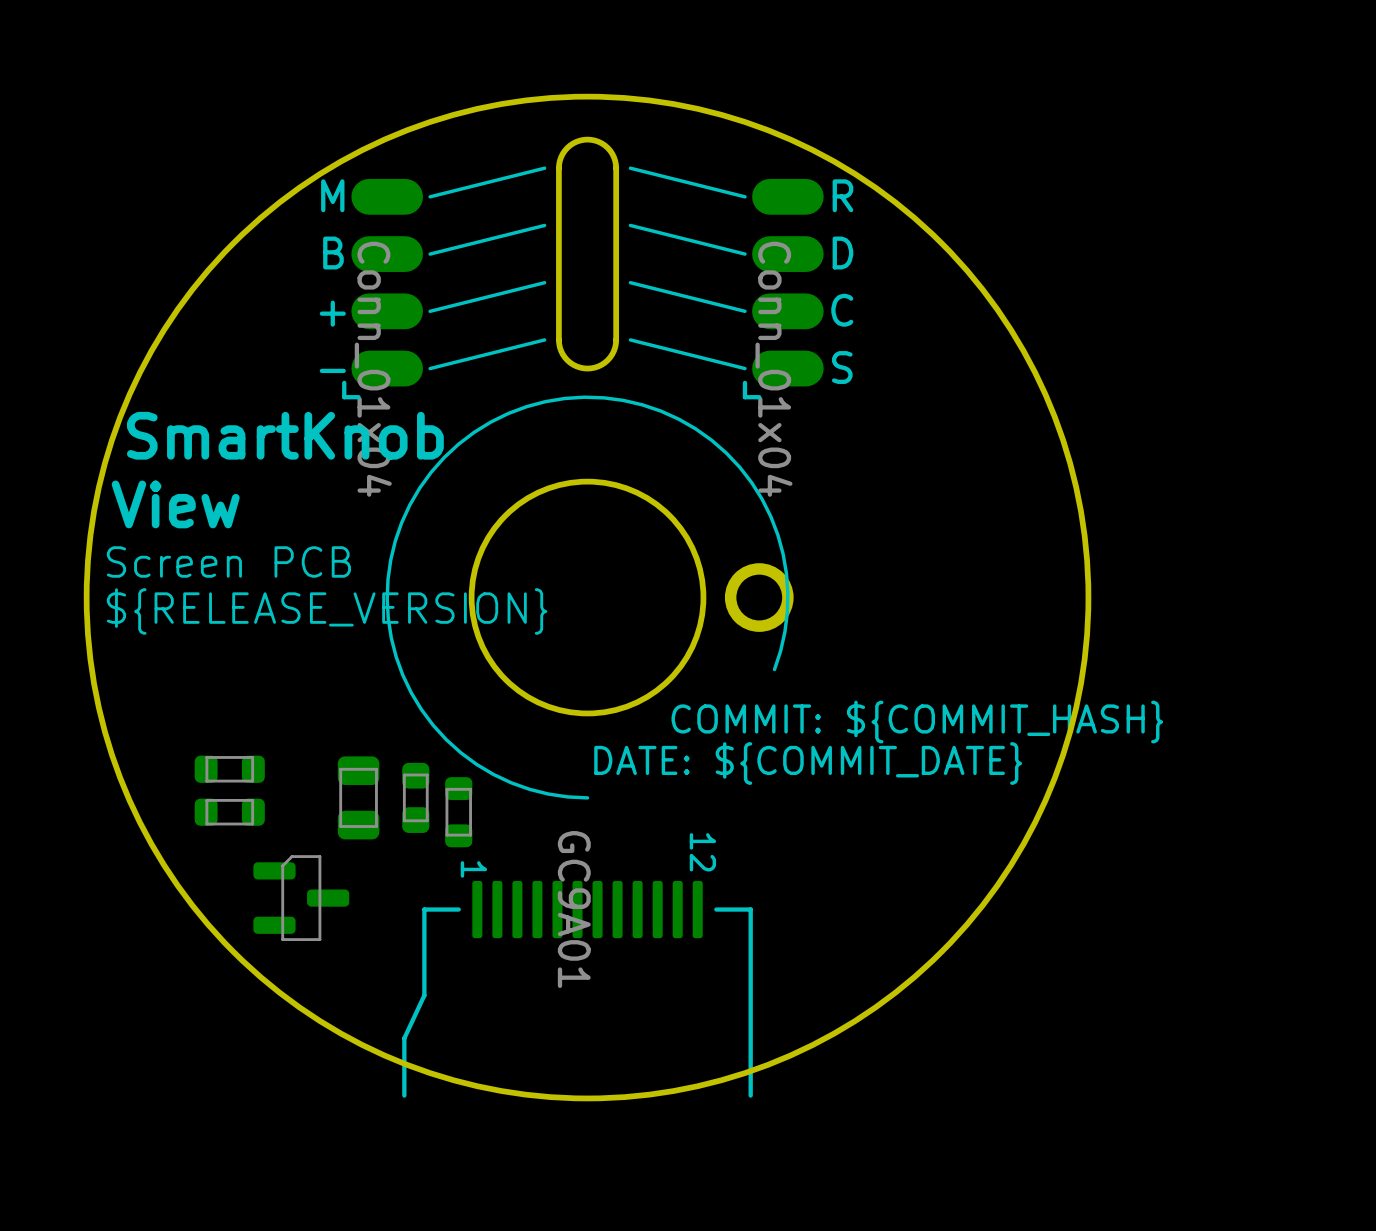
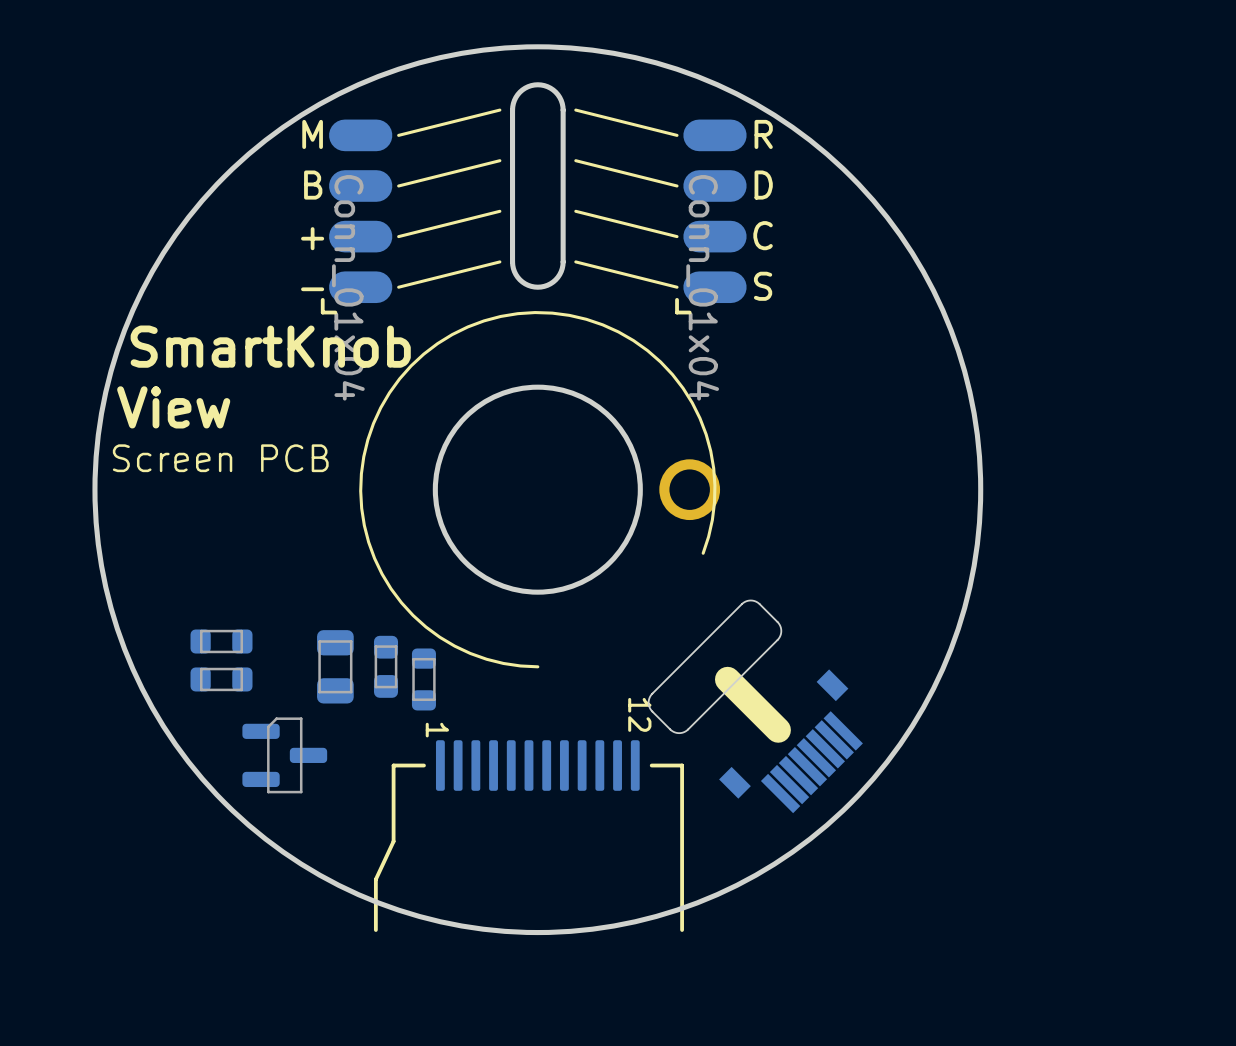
text: ${RELEASE_VERSION} (327, 611) -> none
drawing: none -> [648, 599, 782, 734]
text: COMMIT: ${COMMIT_HASH} (917, 722) -> none
text: DATE: ${COMMIT_DATE} (808, 763) -> none
line: none -> (727, 679) (778, 730)
part: none -> (791, 741)
part value: GC9A01 (574, 909) -> none

